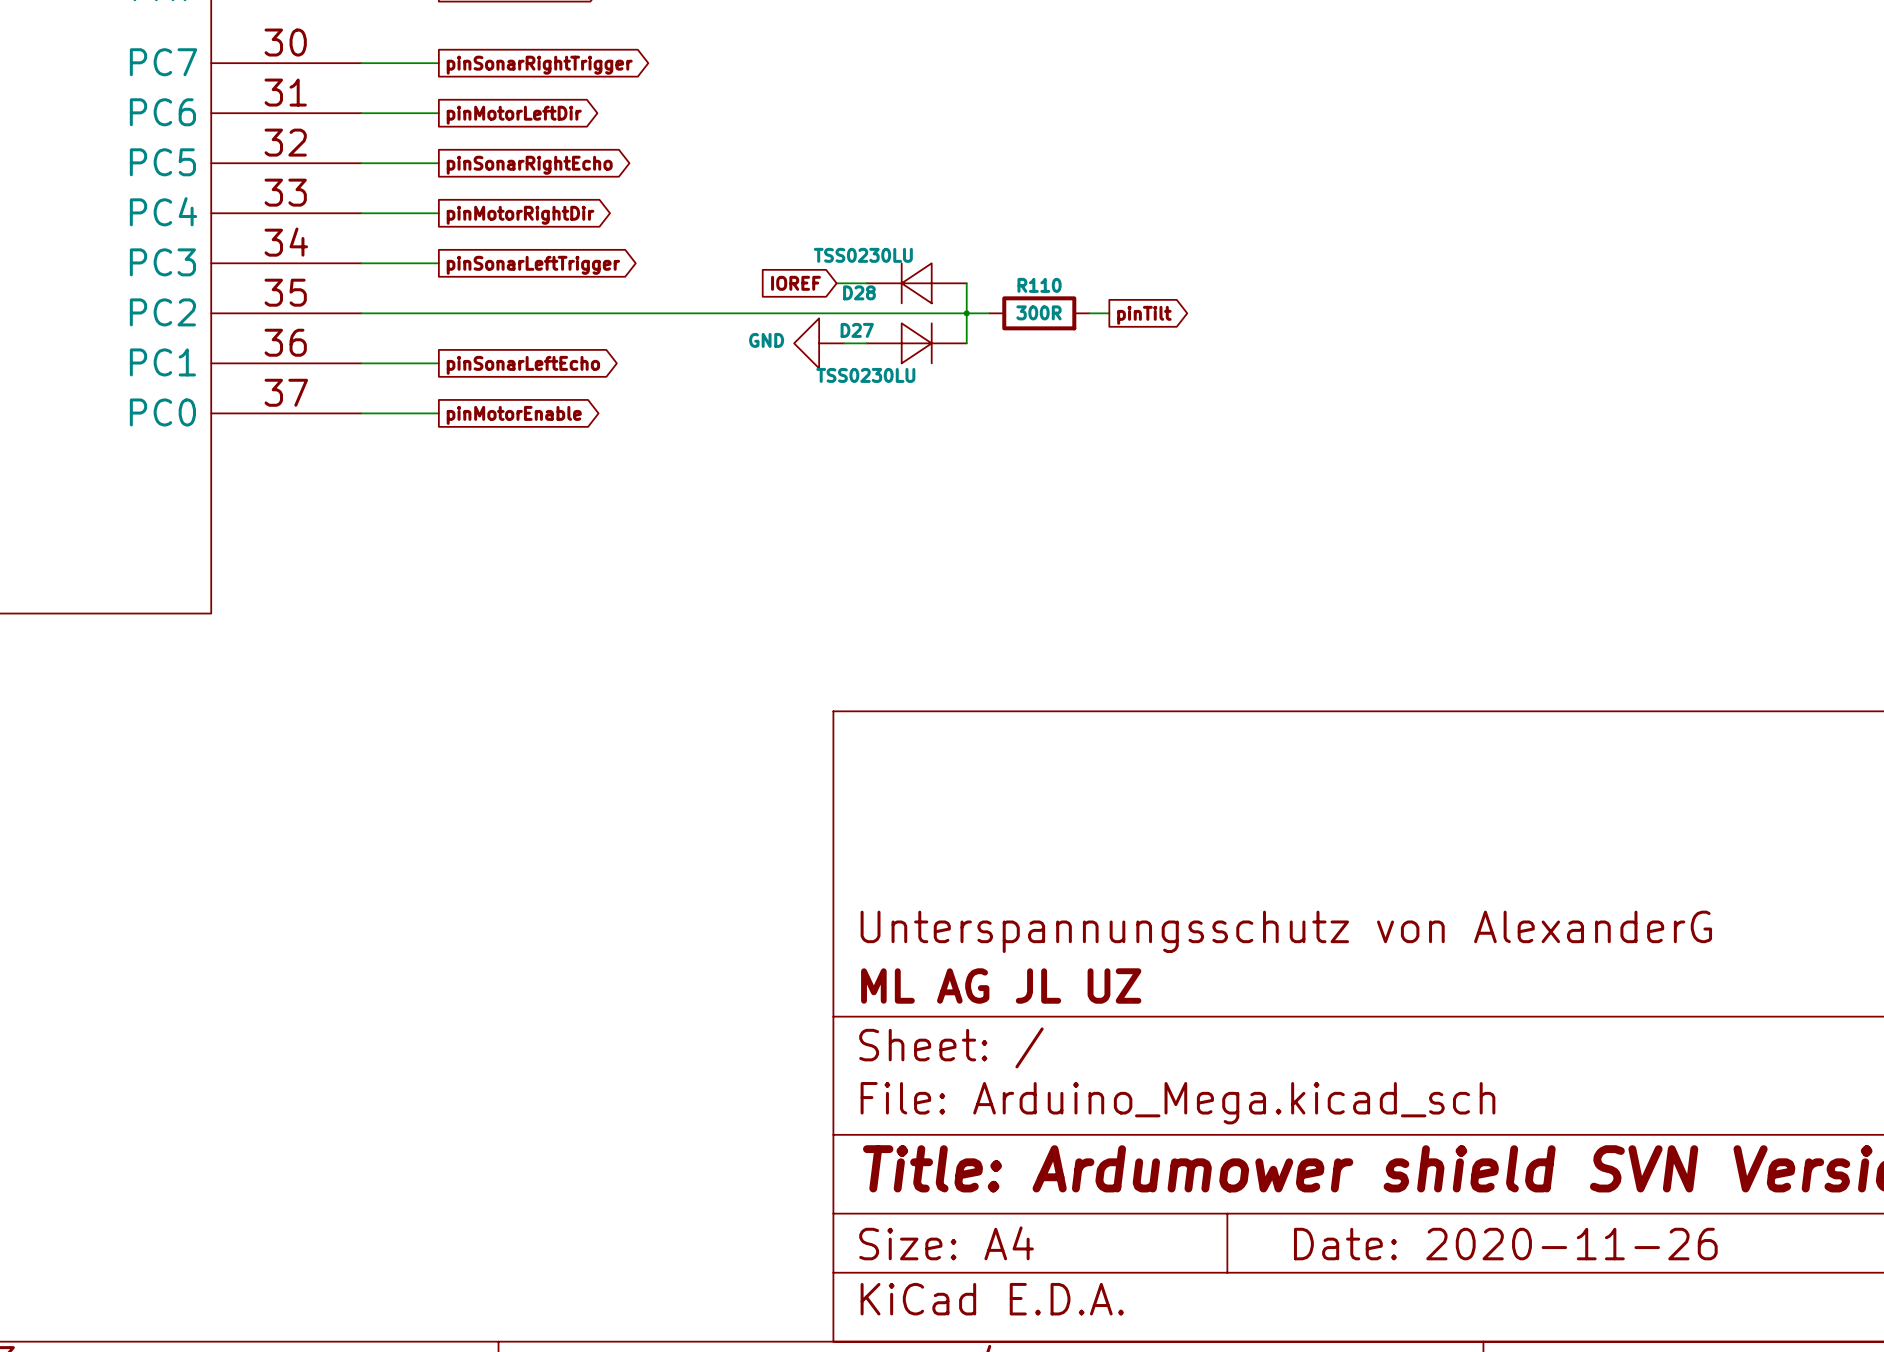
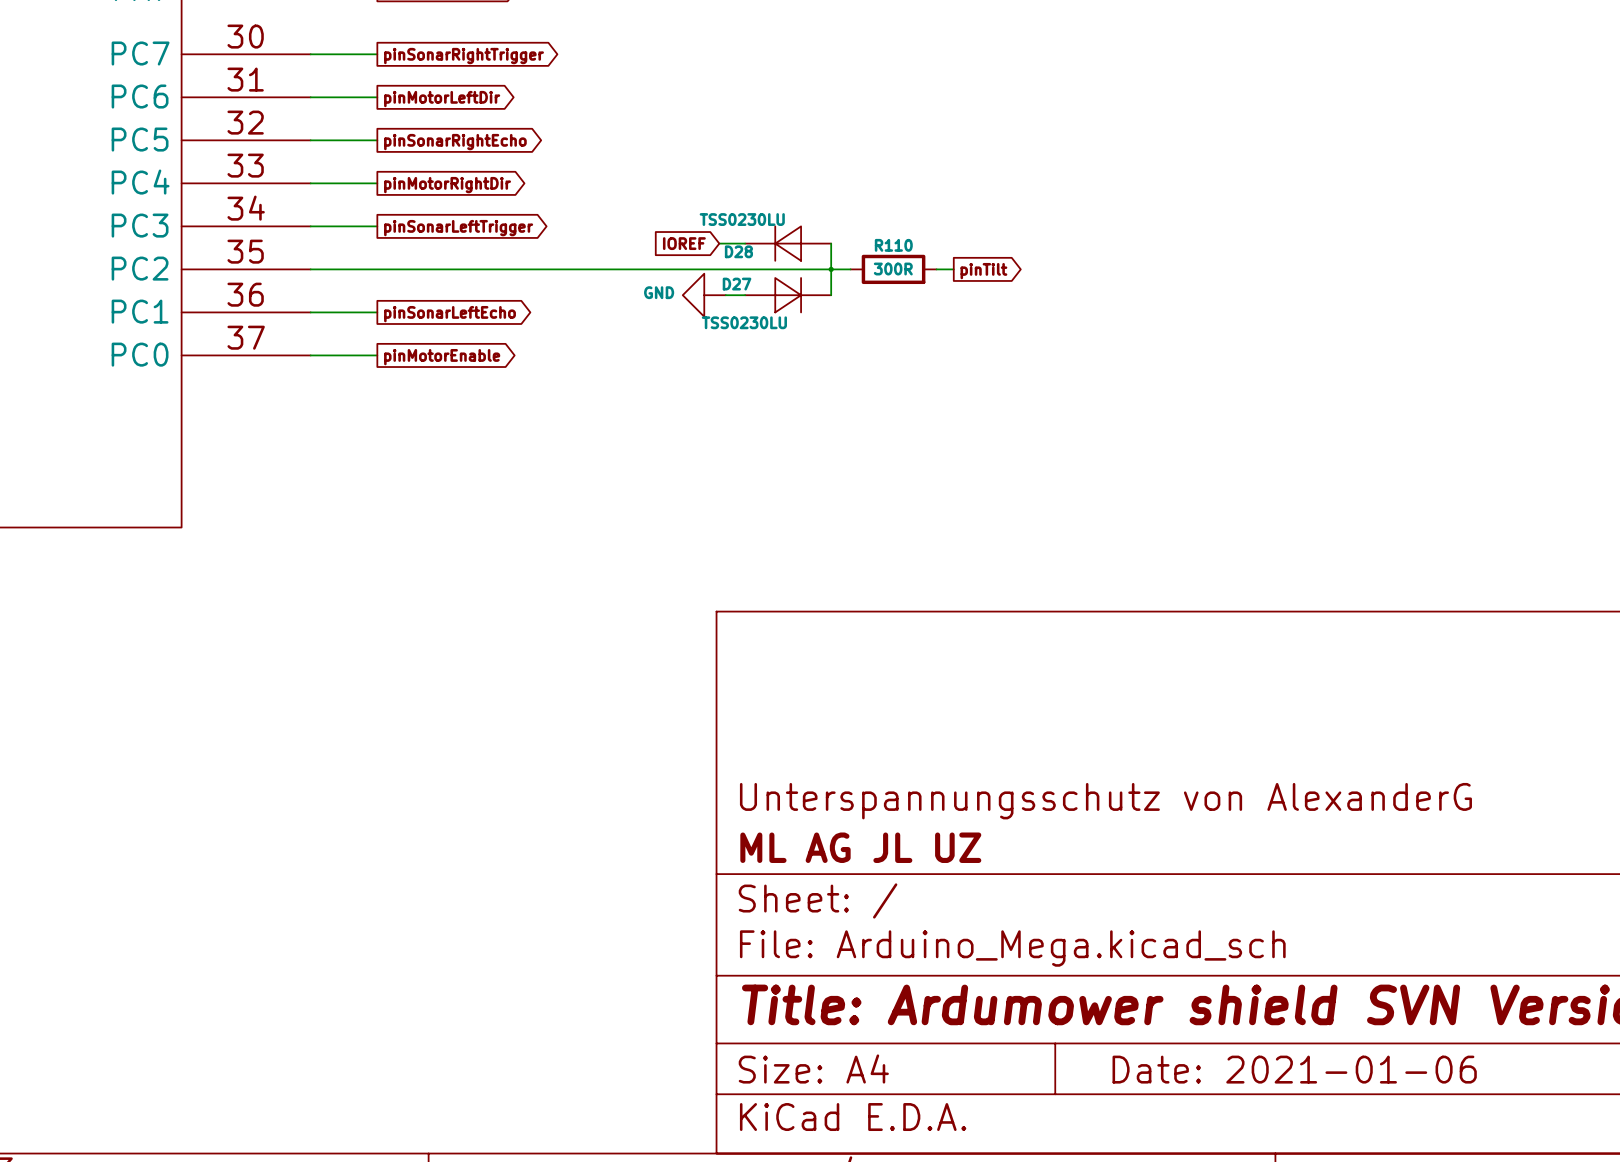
title block: Date: 2020-11-26 (1505, 1244) -> Date: 2021-01-06 (1294, 1069)

